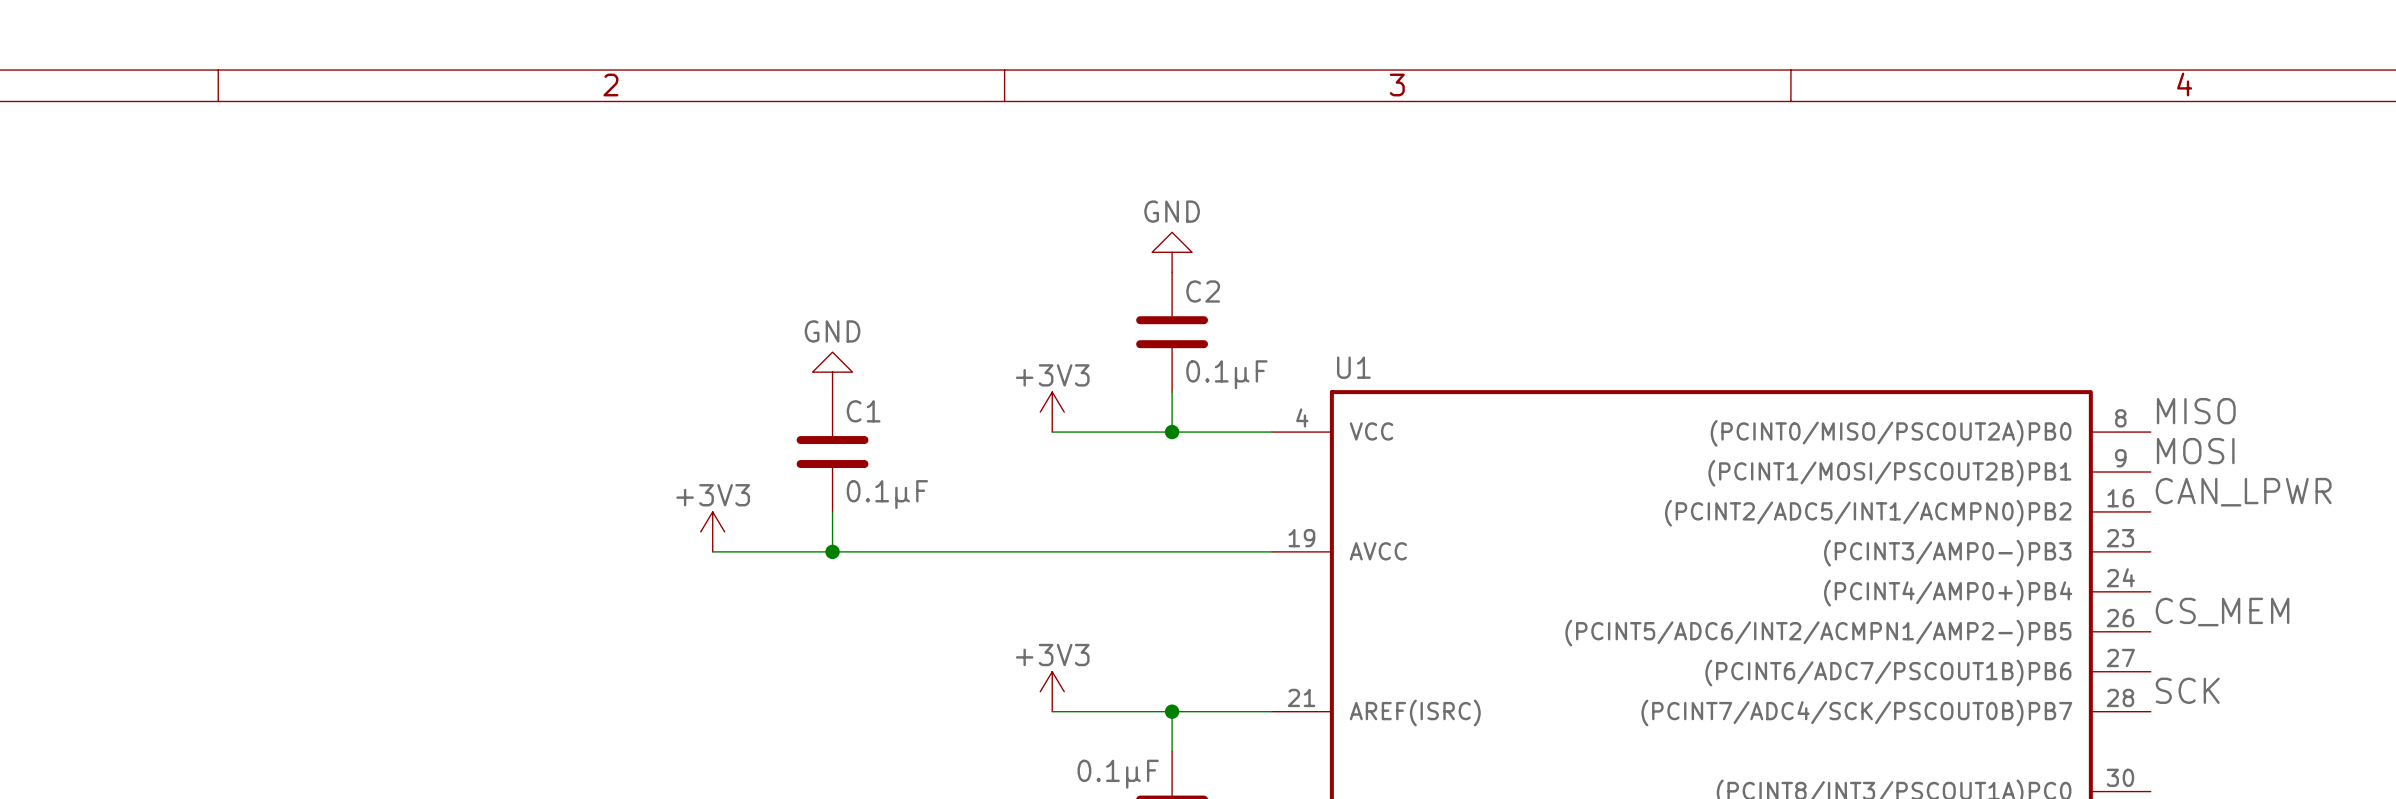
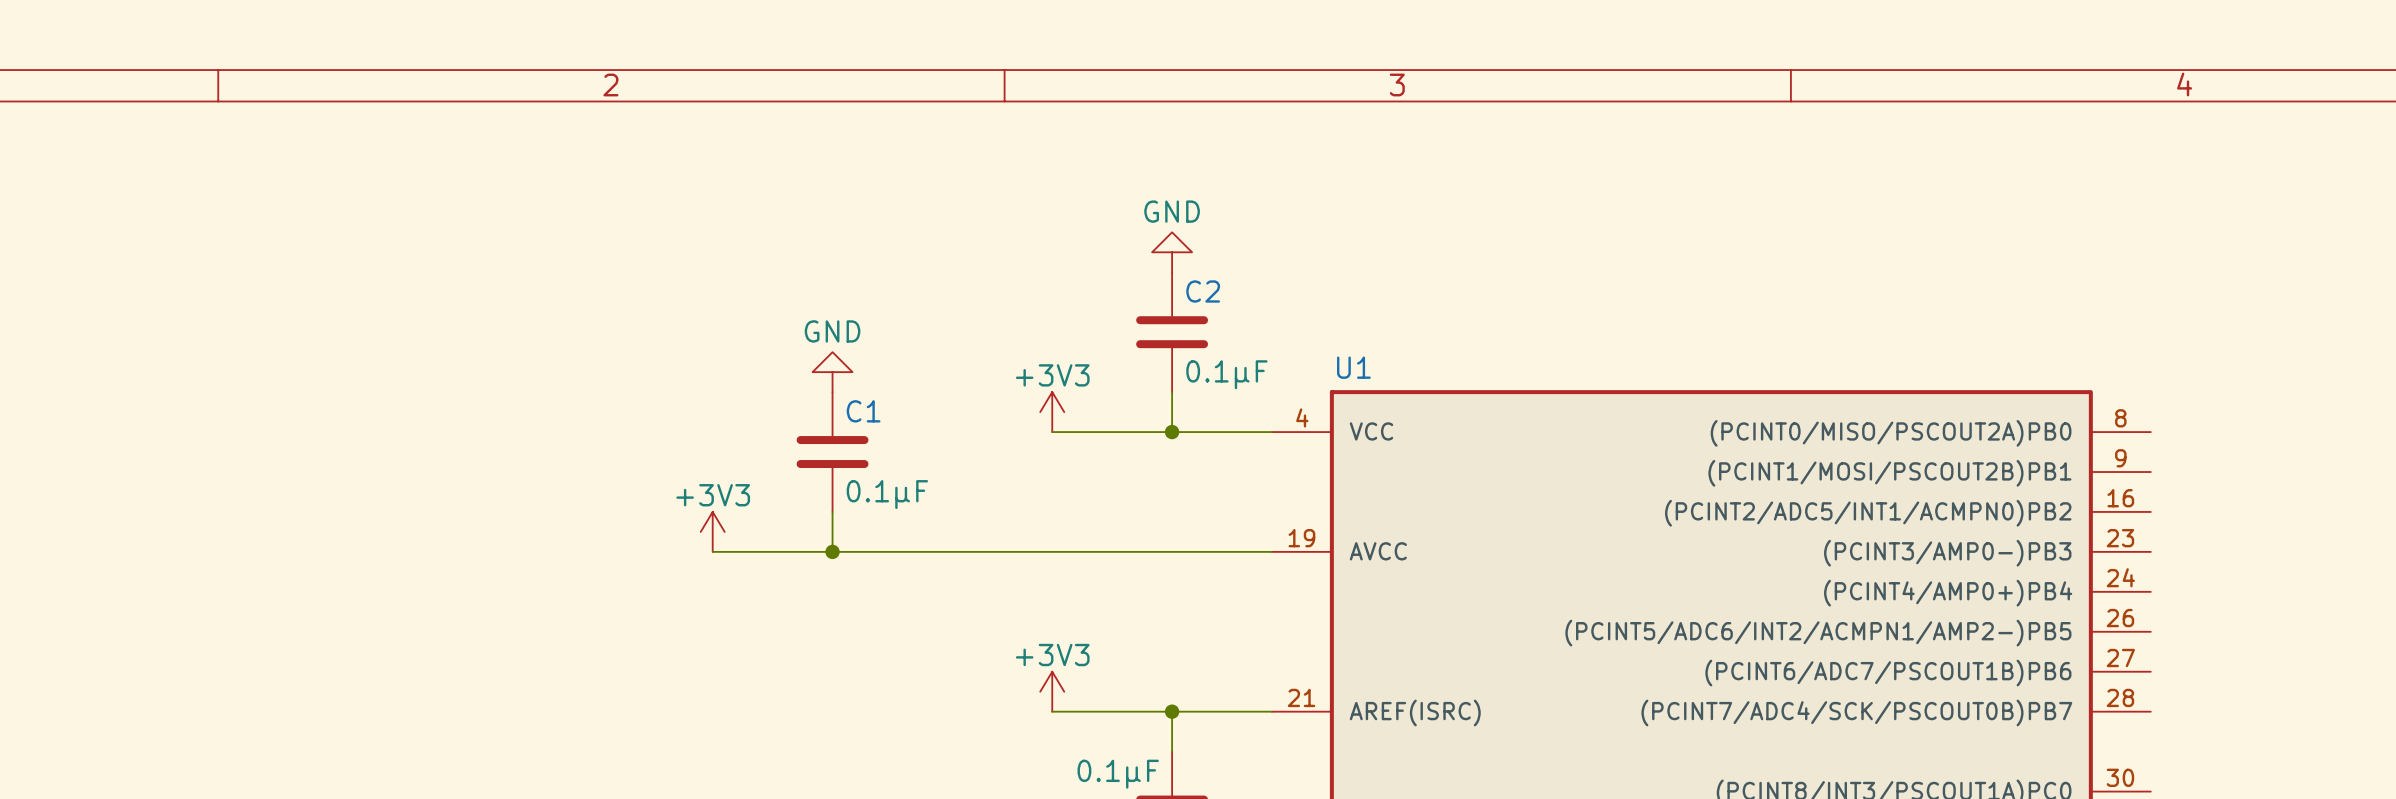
label: MISO (2196, 411) -> none
label: MOSI (2195, 451) -> none
label: CAN_LPWR (2243, 492) -> none
label: CS_MEM (2222, 612) -> none
label: SCK (2187, 690) -> none

